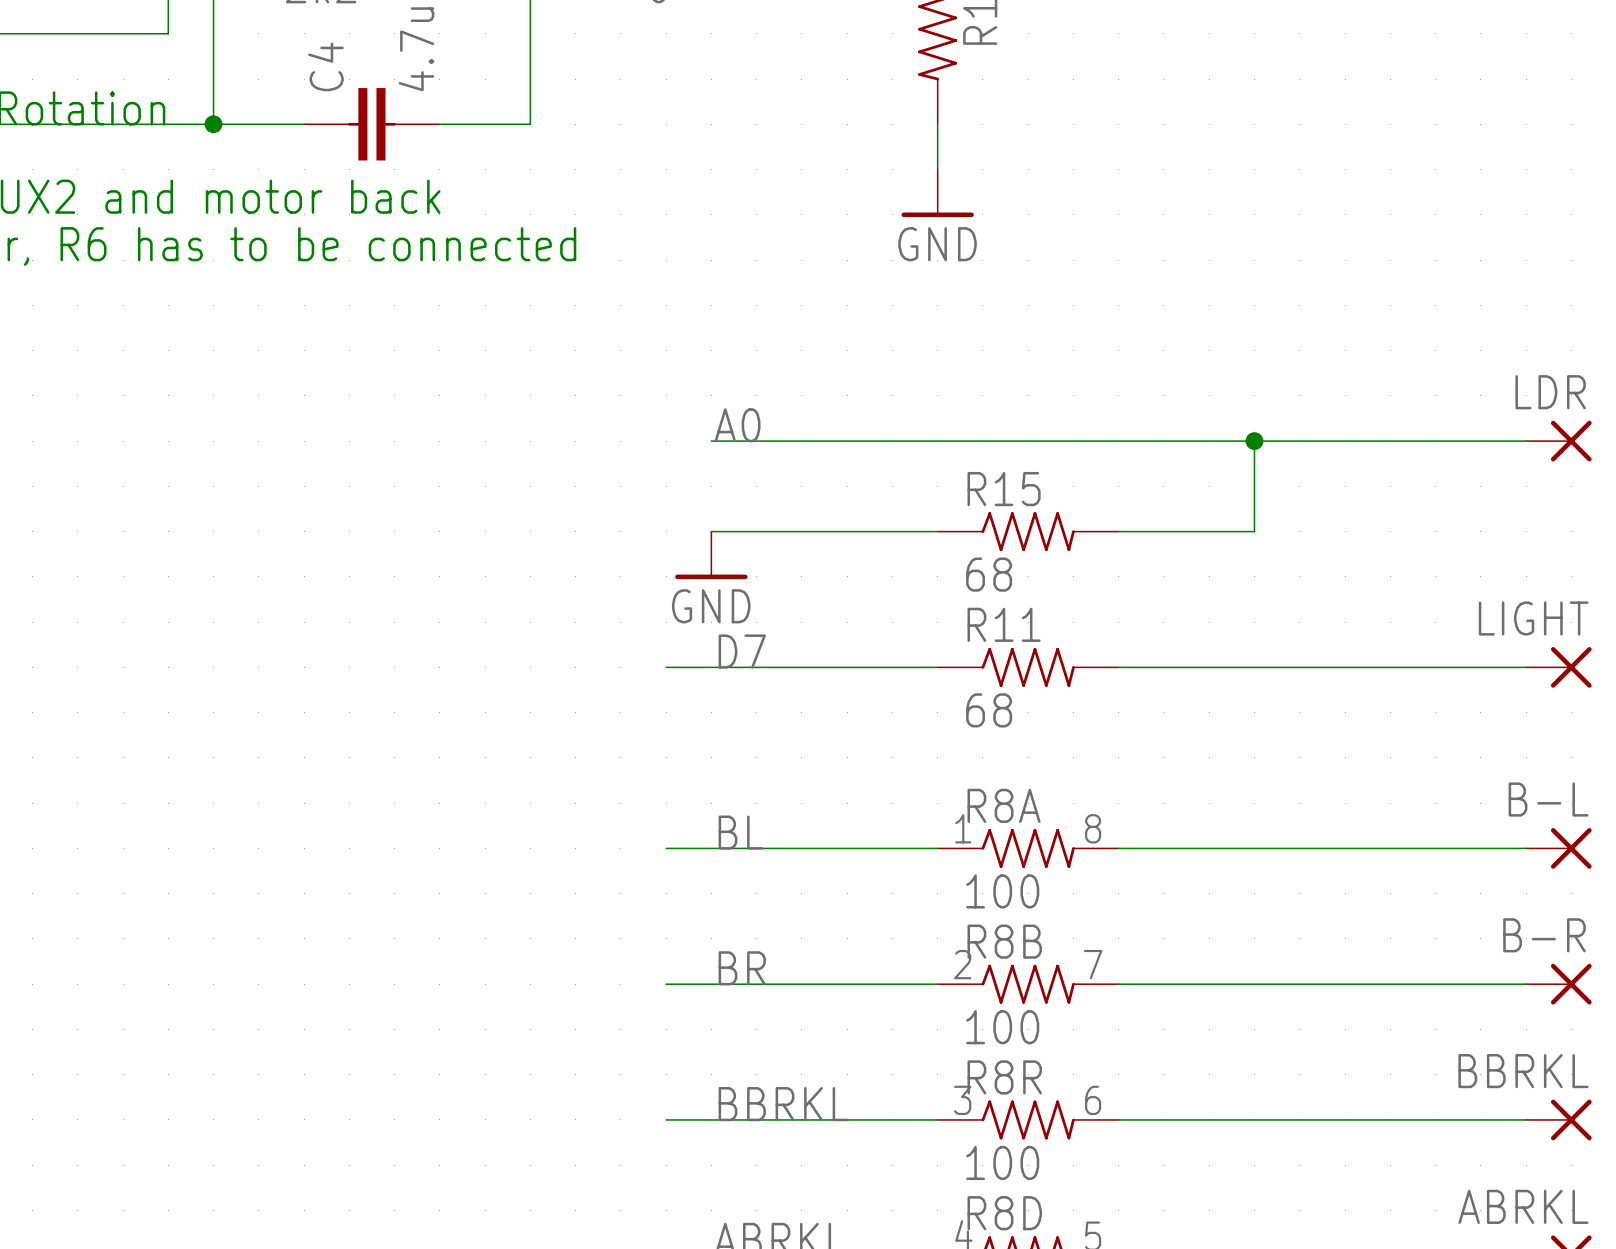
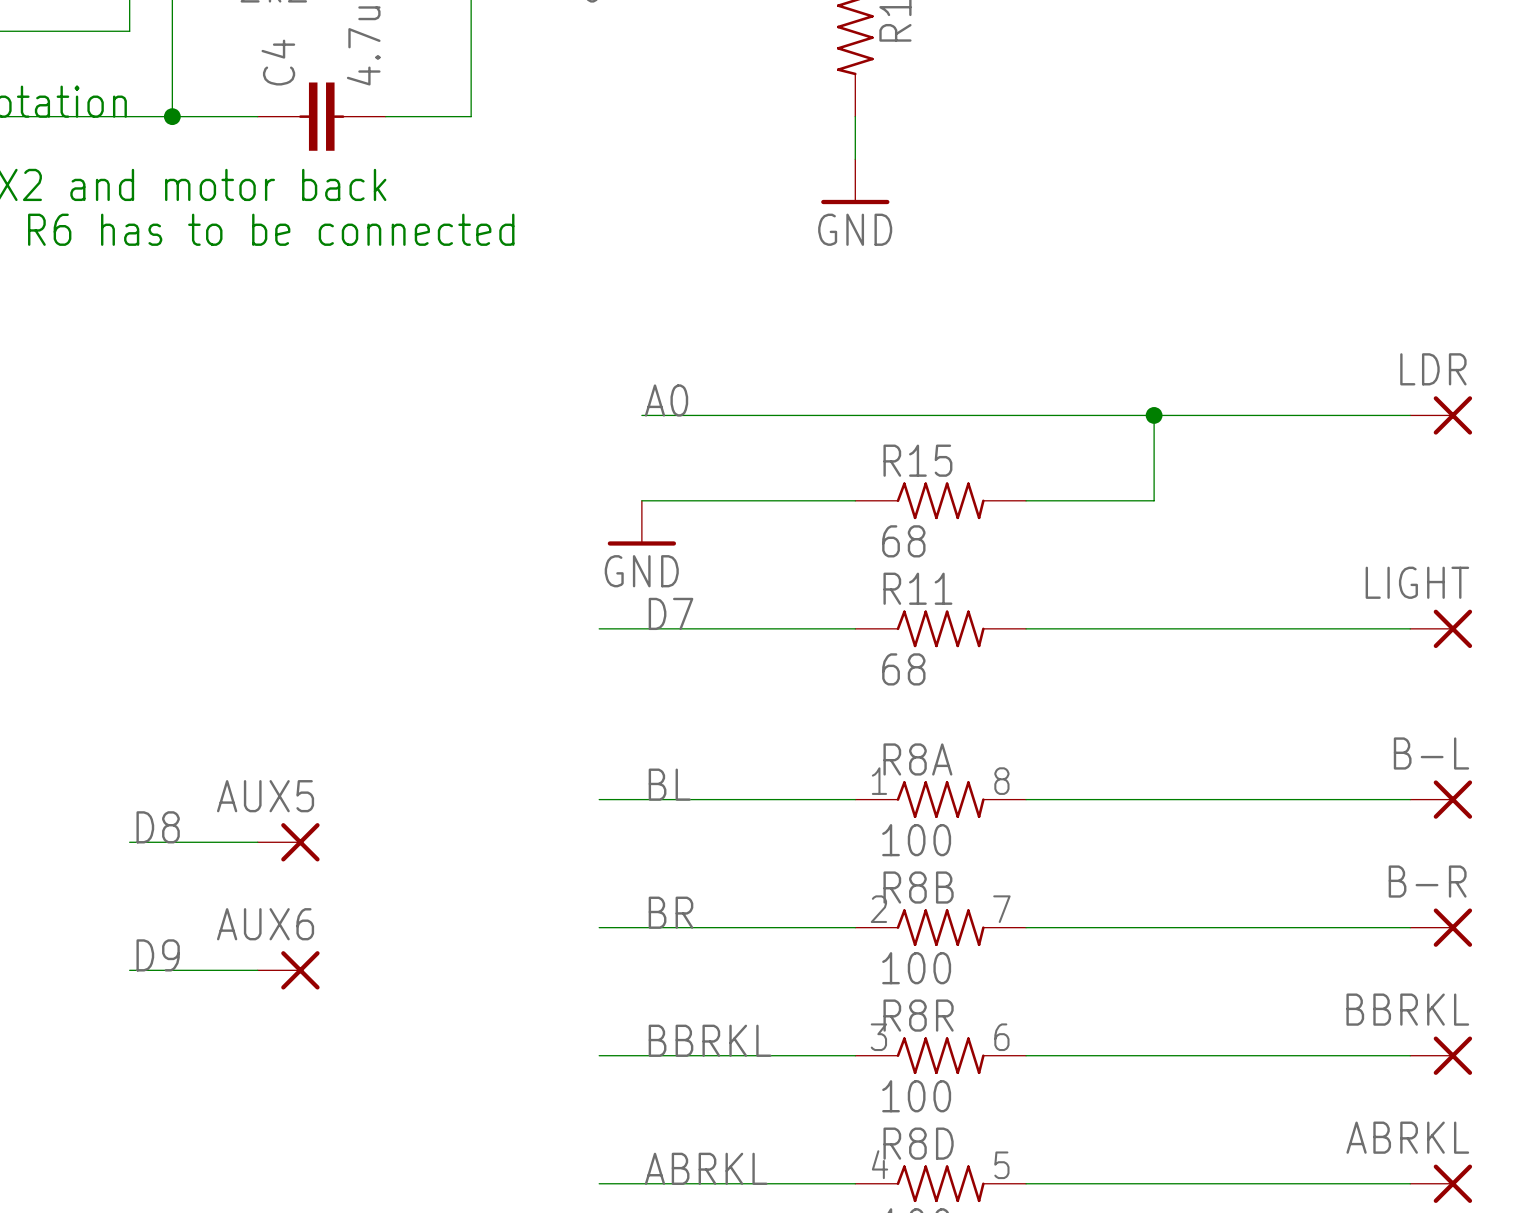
label: none -> D8 (158, 827)
wire: none -> (129, 842) (257, 842)
AUX5: none -> (288, 842)
label: none -> D9 (158, 955)
wire: none -> (129, 970) (257, 970)
AUX6: none -> (288, 970)

